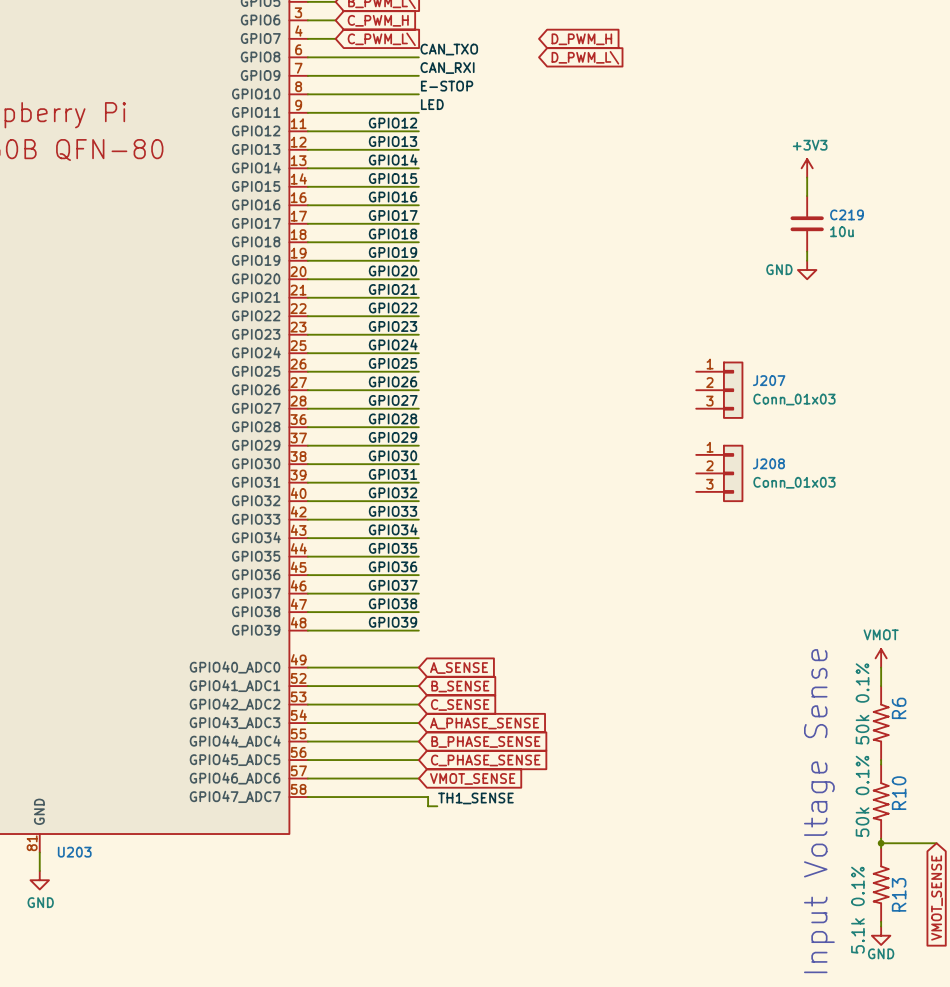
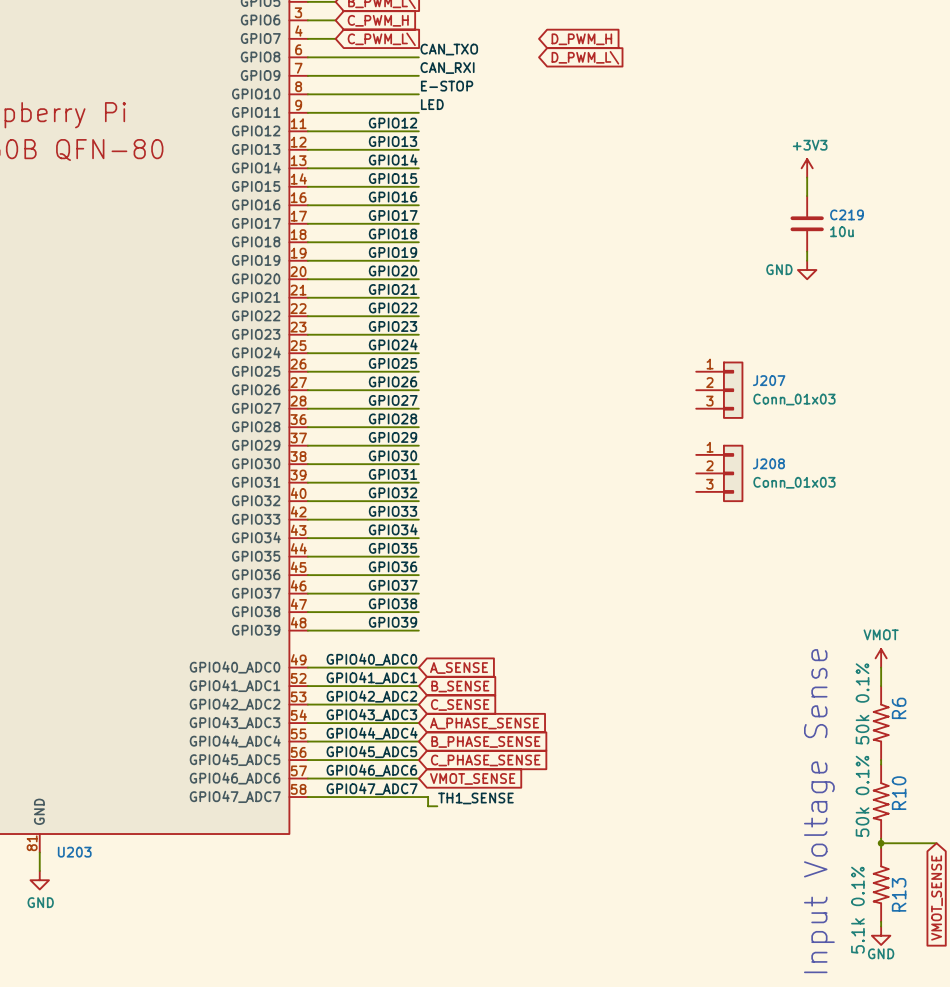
label: none -> GPIO40_ADC0 (371, 659)
label: none -> GPIO41_ADC1 (371, 678)
label: none -> GPIO42_ADC2 (371, 696)
label: none -> GPIO43_ADC3 (371, 715)
label: none -> GPIO44_ADC4 (372, 733)
label: none -> GPIO45_ADC5 (371, 752)
label: none -> GPIO46_ADC6 (371, 770)
label: none -> GPIO47_ADC7 (372, 788)

